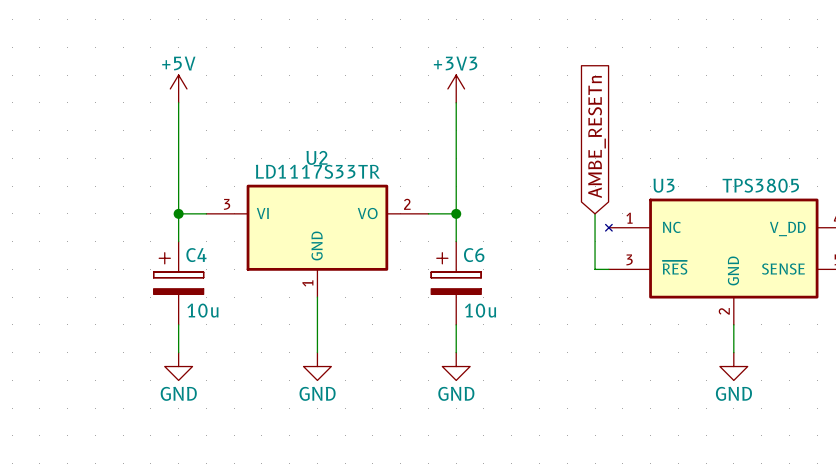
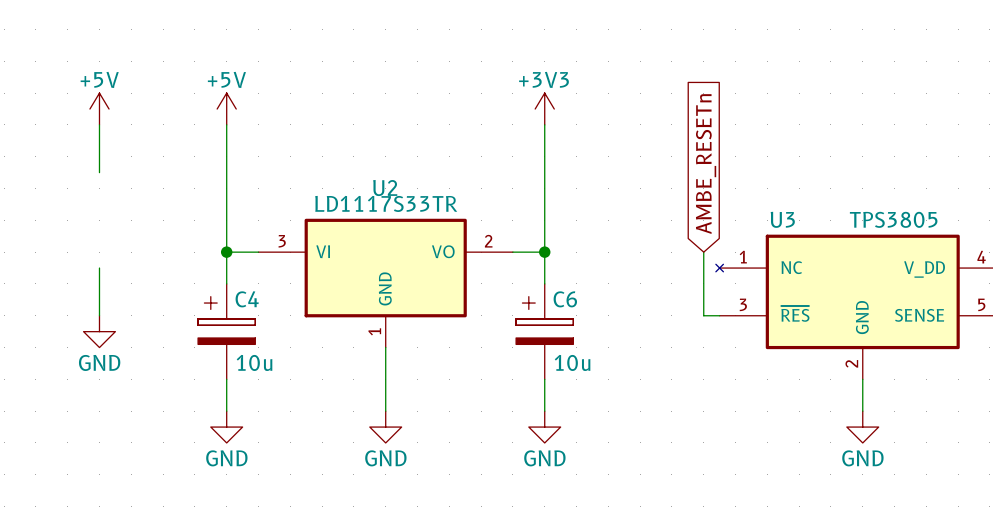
power symbol: none -> +5V (99, 109)
wire: none -> (99, 124) (99, 172)
wire: none -> (99, 268) (99, 315)
power symbol: none -> GND (99, 331)

